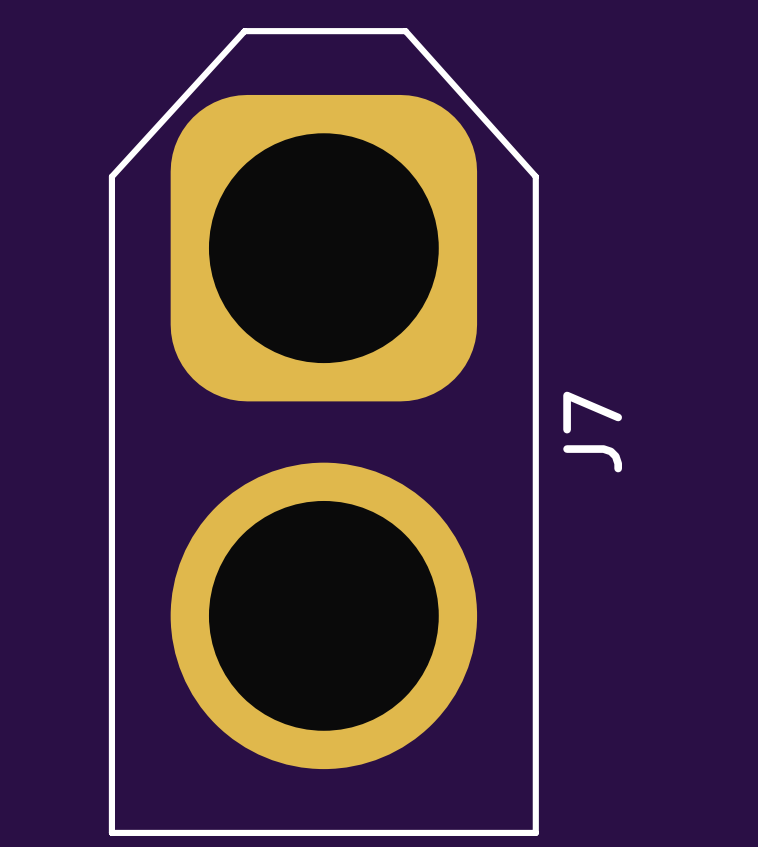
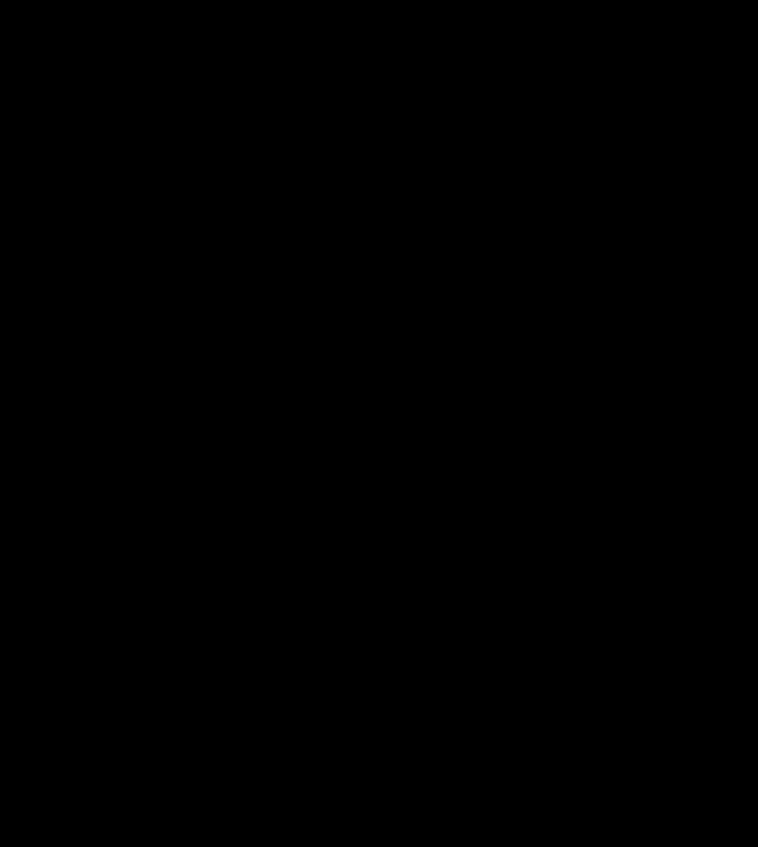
J7: (323, 432) -> none

